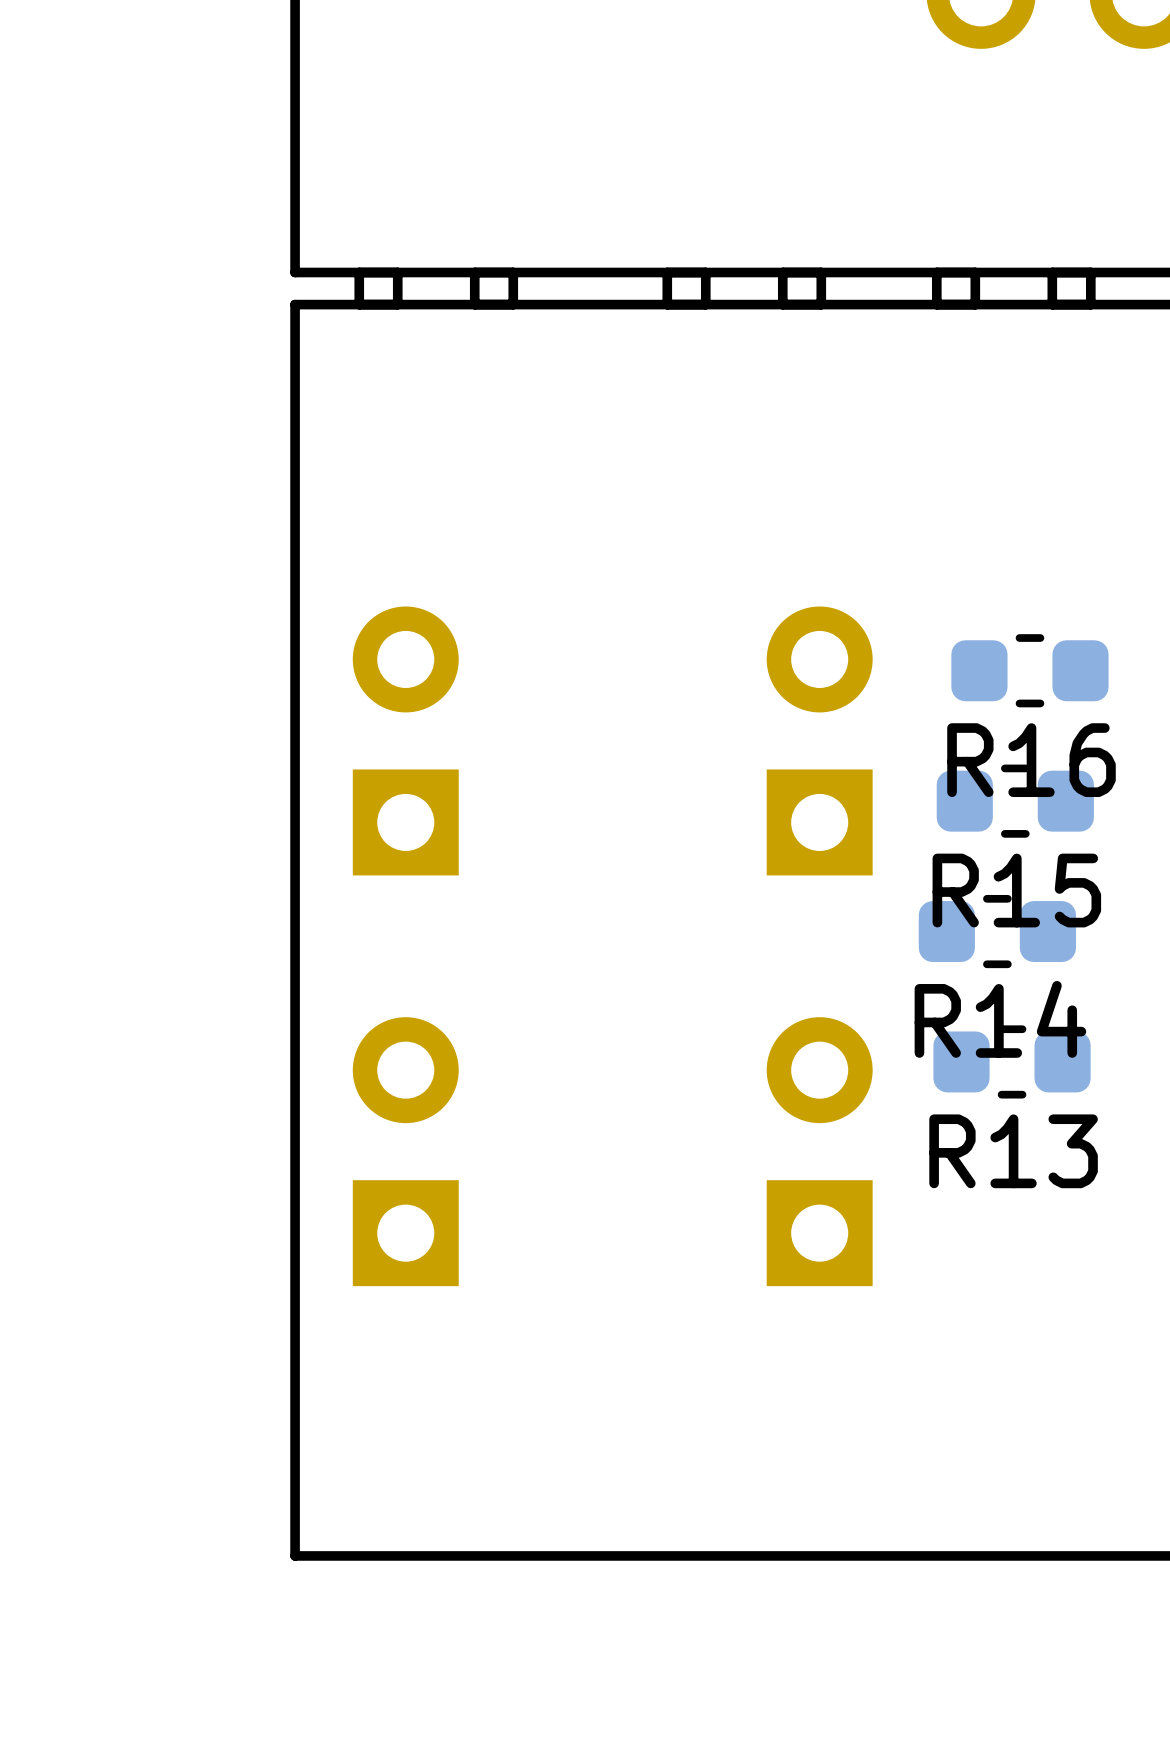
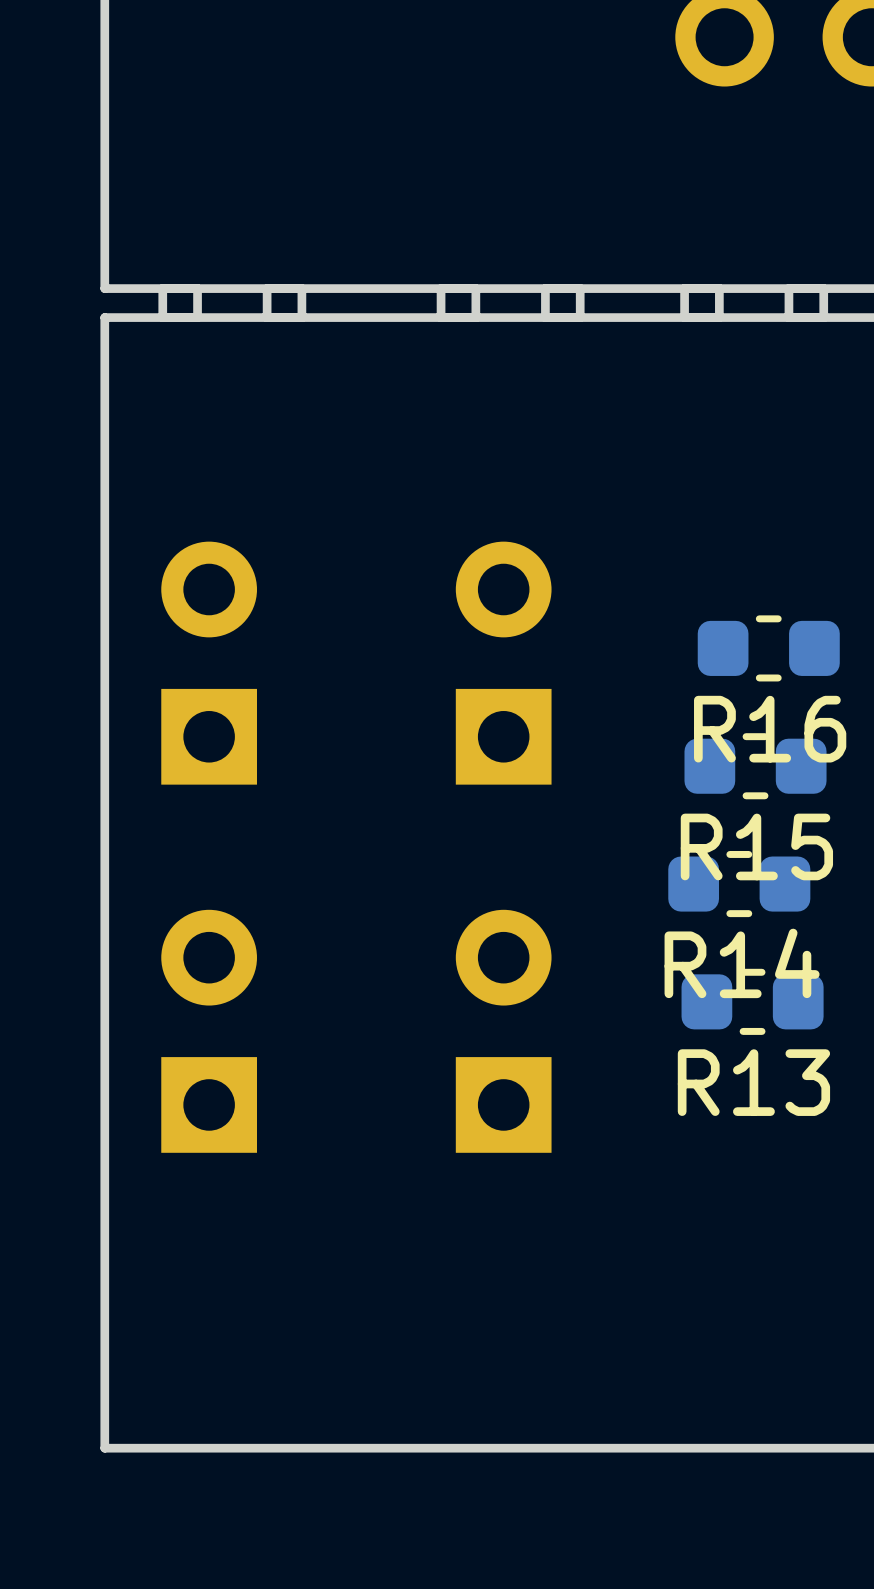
part position: (405, 740) -> (209, 663)
part position: (819, 740) -> (503, 663)
part position: (405, 1151) -> (209, 1031)
part position: (819, 1151) -> (503, 1031)

